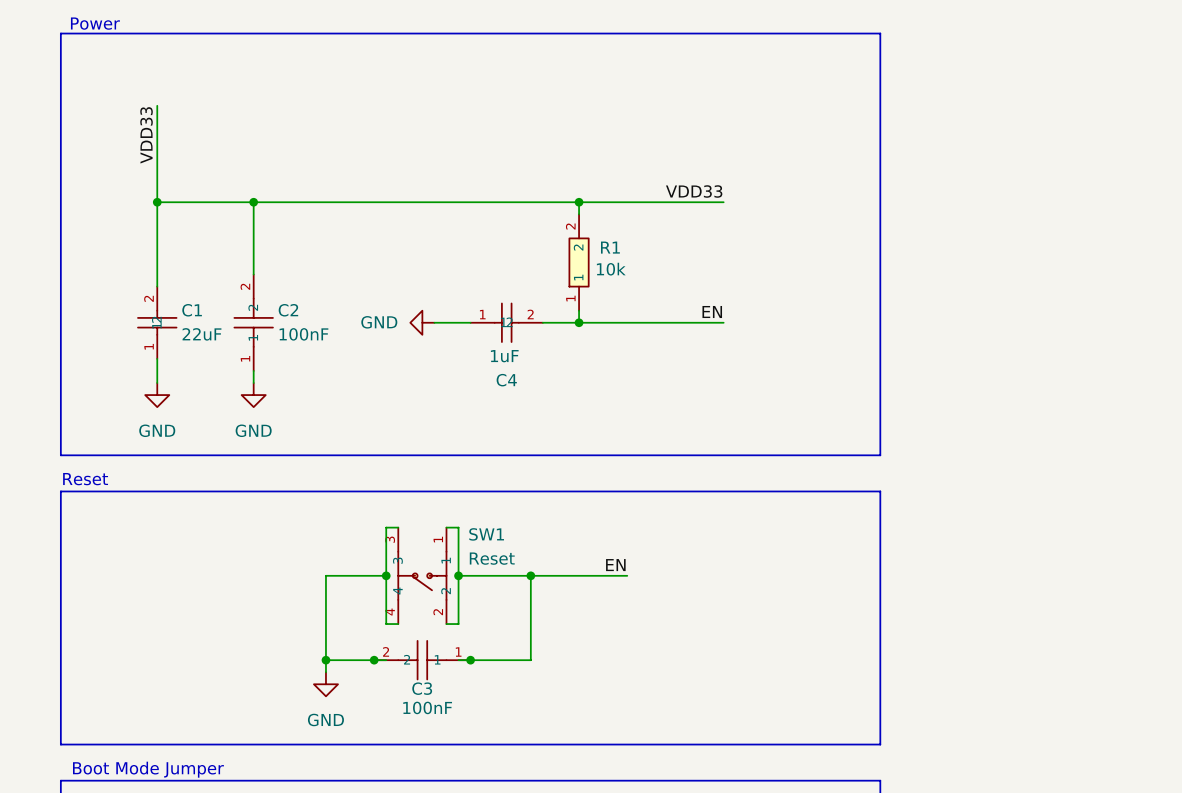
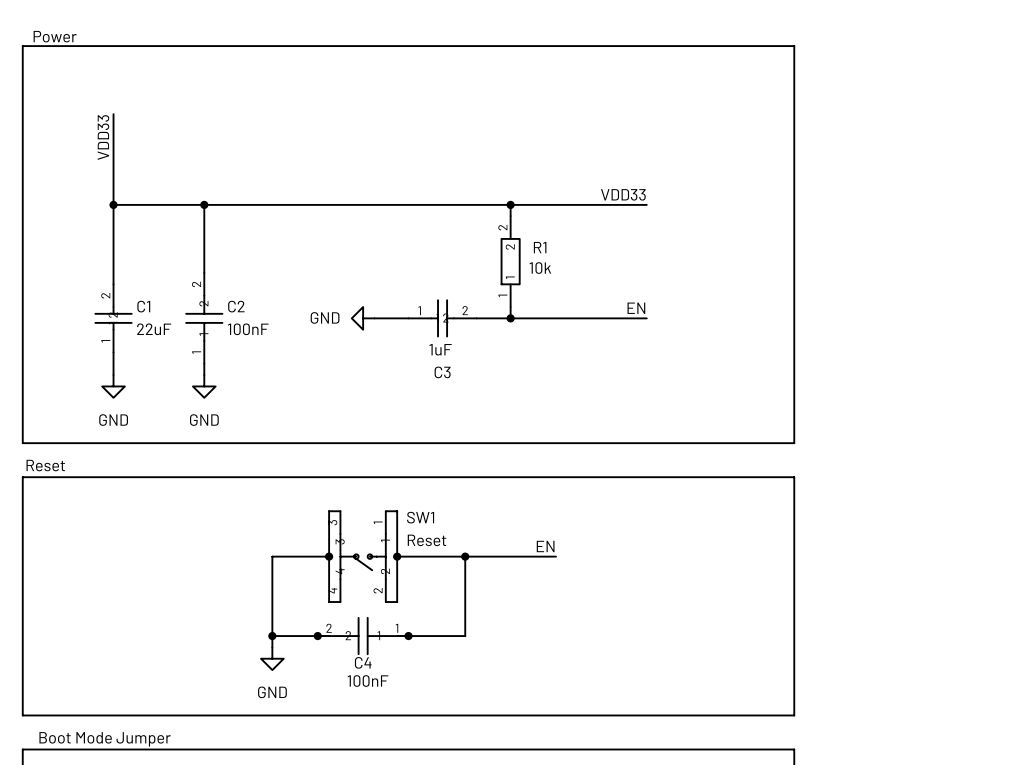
C4 name: C4 (506, 380) -> C3 (442, 372)
C3 name: C3 (422, 688) -> C4 (363, 662)

